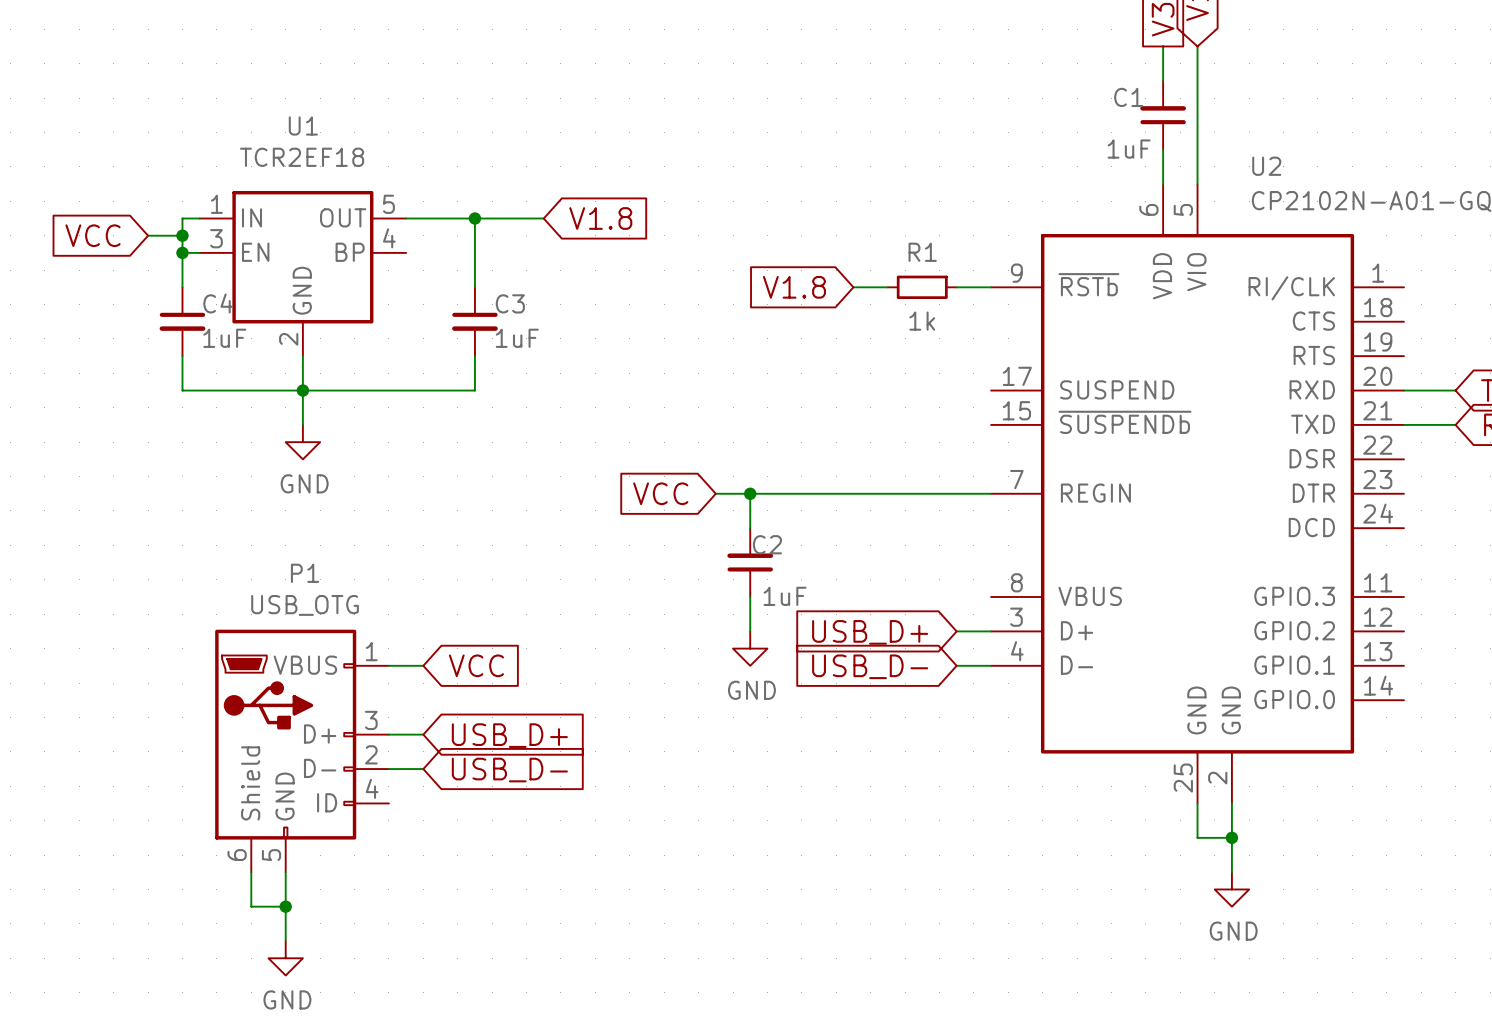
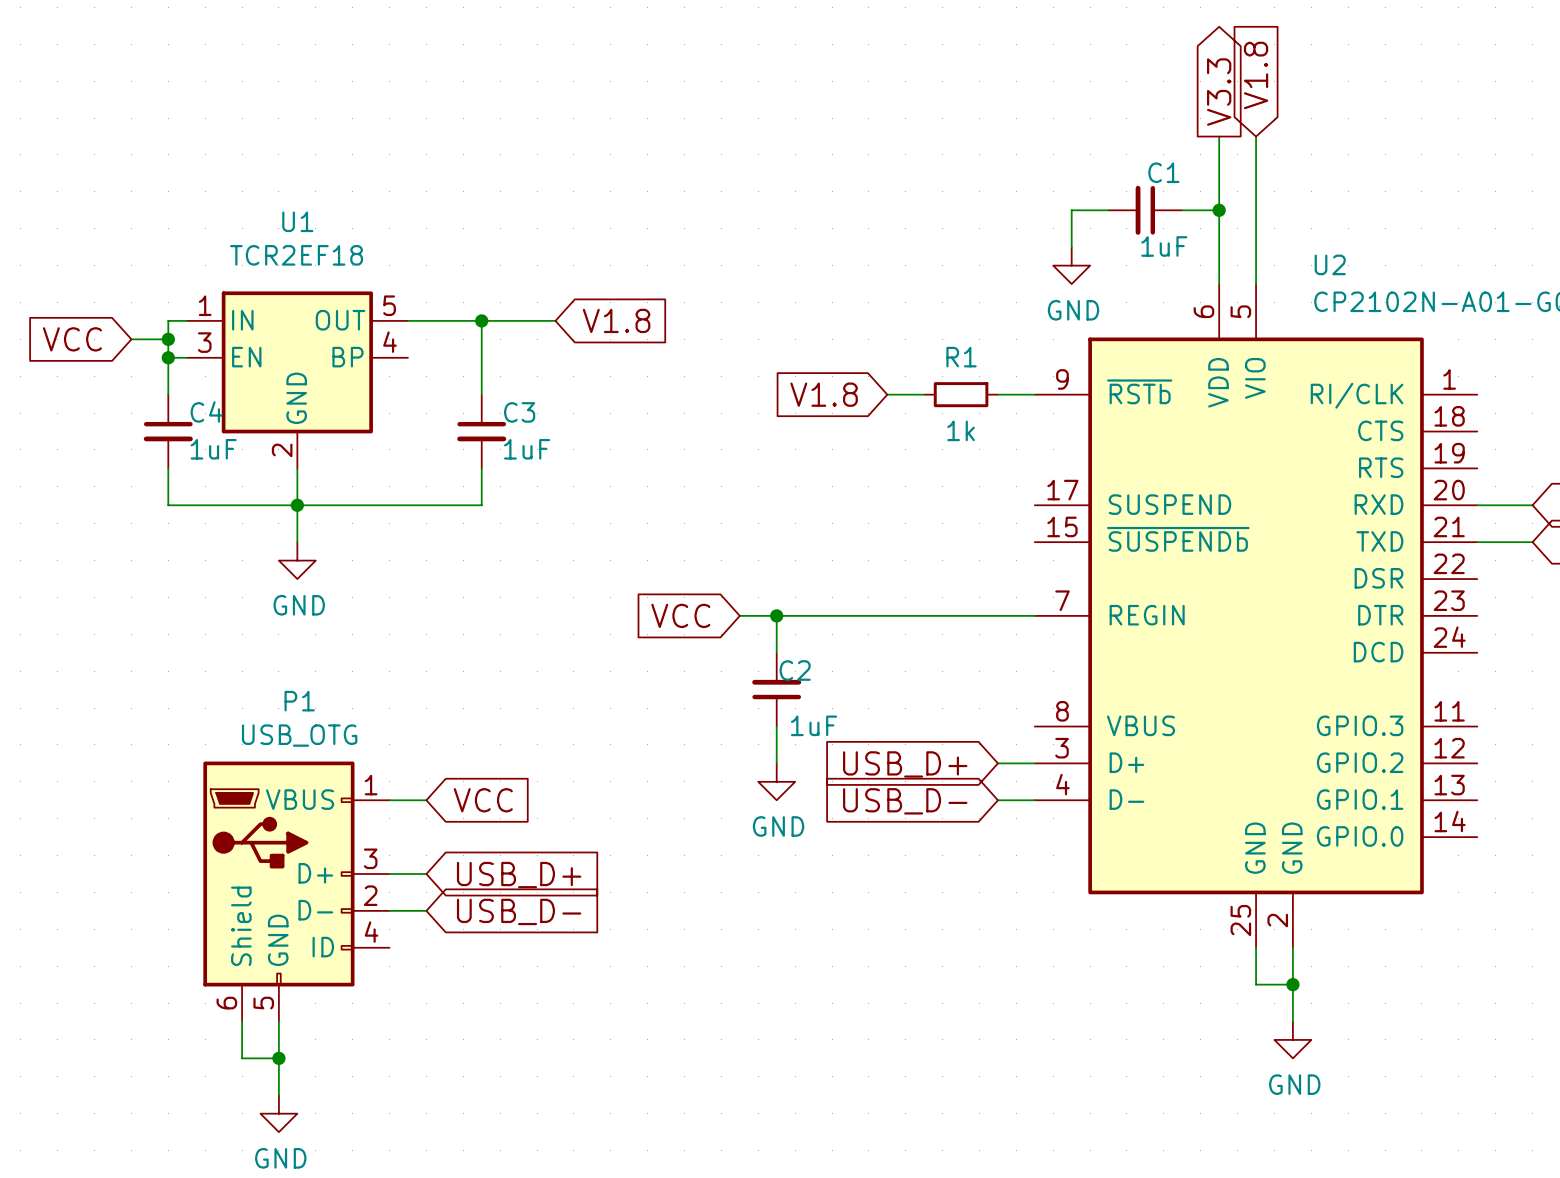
C1 name position: C1 (1128, 97) -> C1 (1163, 172)
wire: none -> (1108, 210) (1071, 210) (1071, 247)
wire: none -> (1182, 210) (1219, 210)
C1 rotation: 0° (1163, 115) -> 90° counterclockwise (1145, 210)
C1 position: (1163, 115) -> (1145, 210)
junction: none -> (1219, 210)
power symbol: none -> GND (1071, 265)

